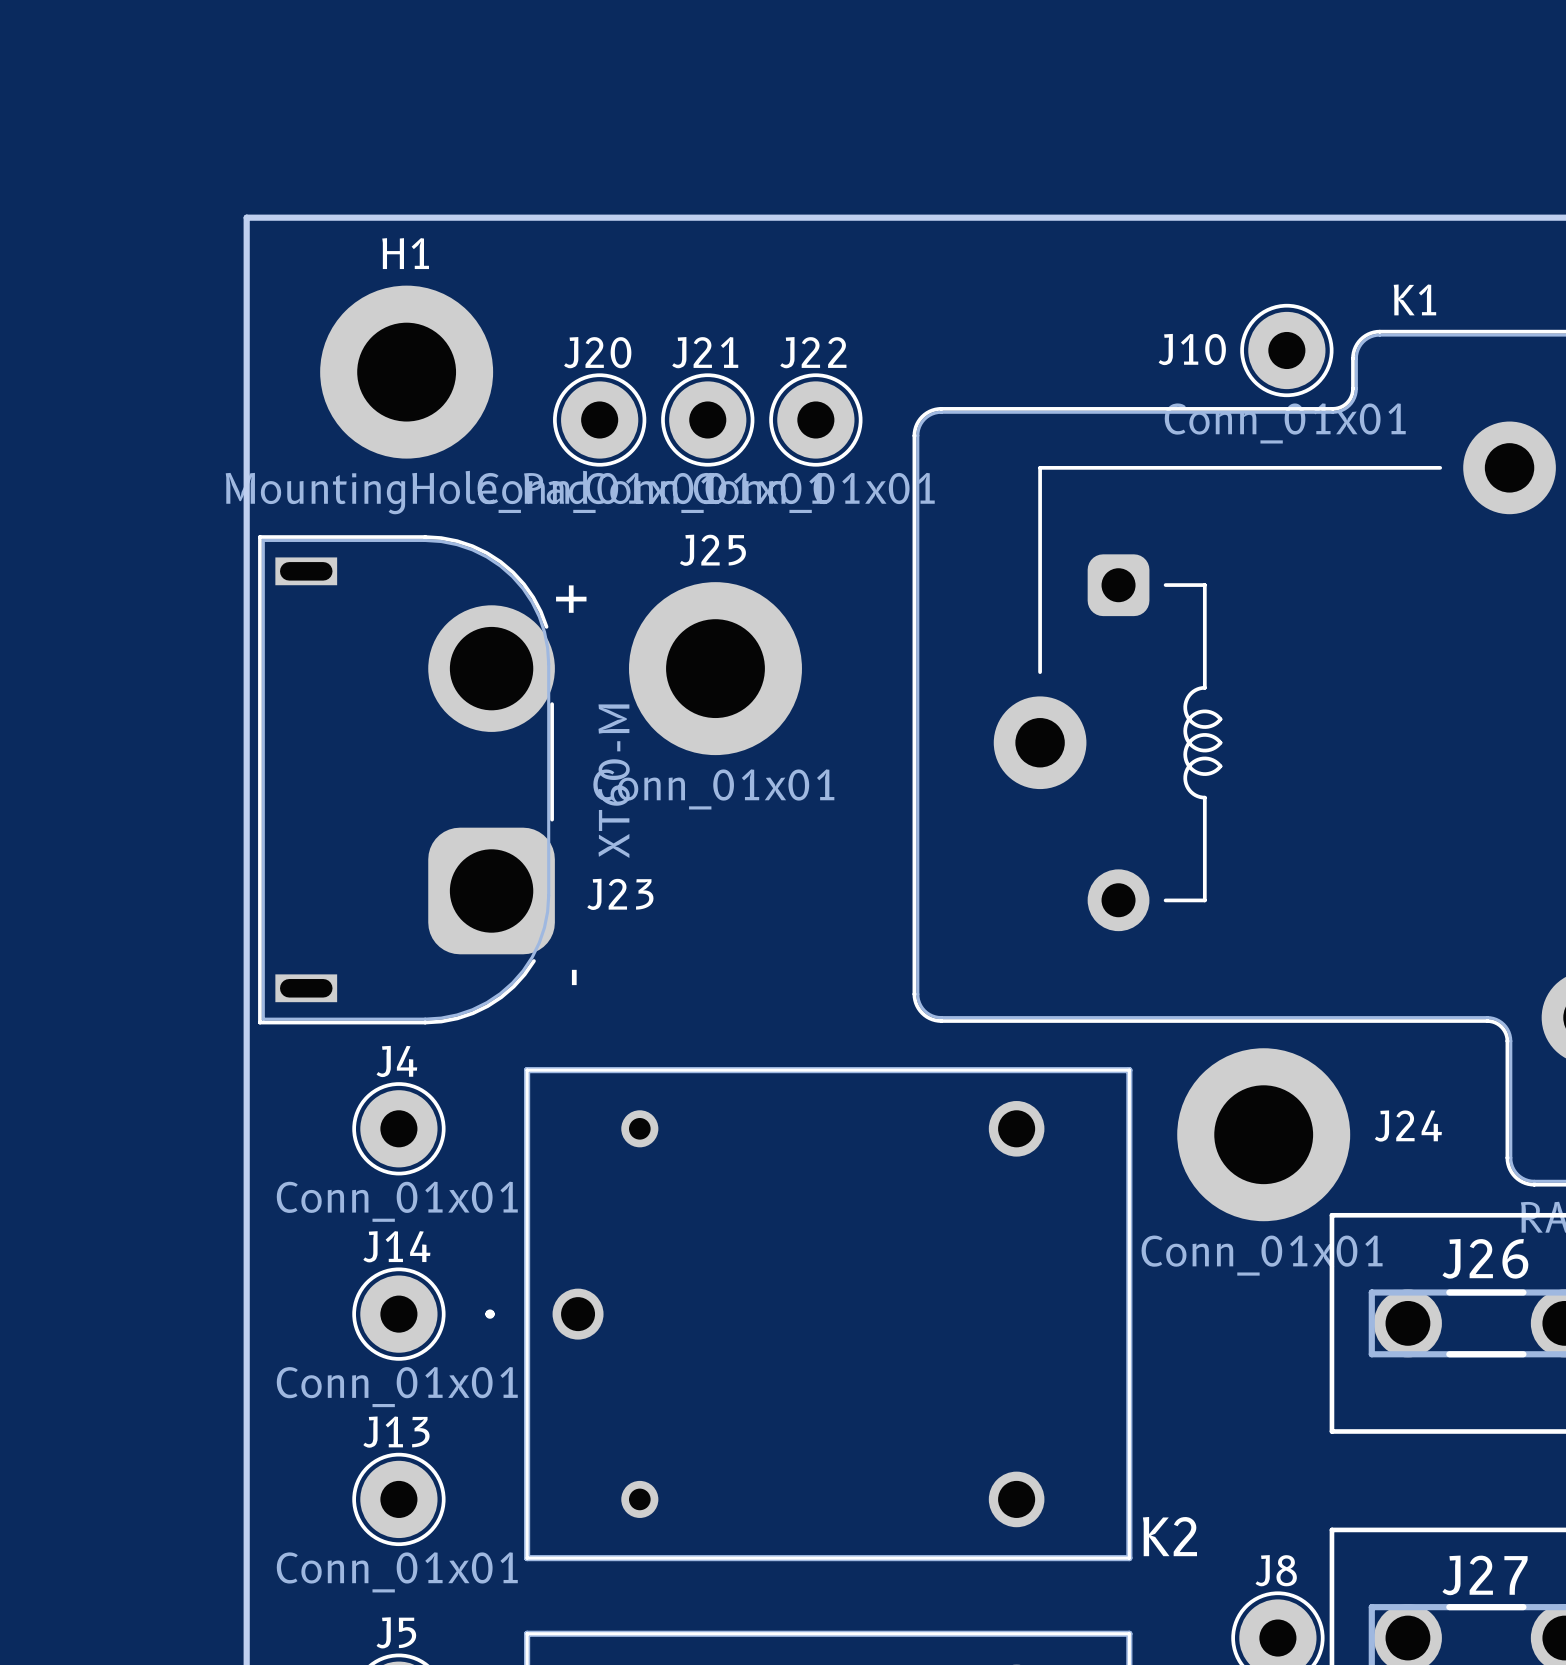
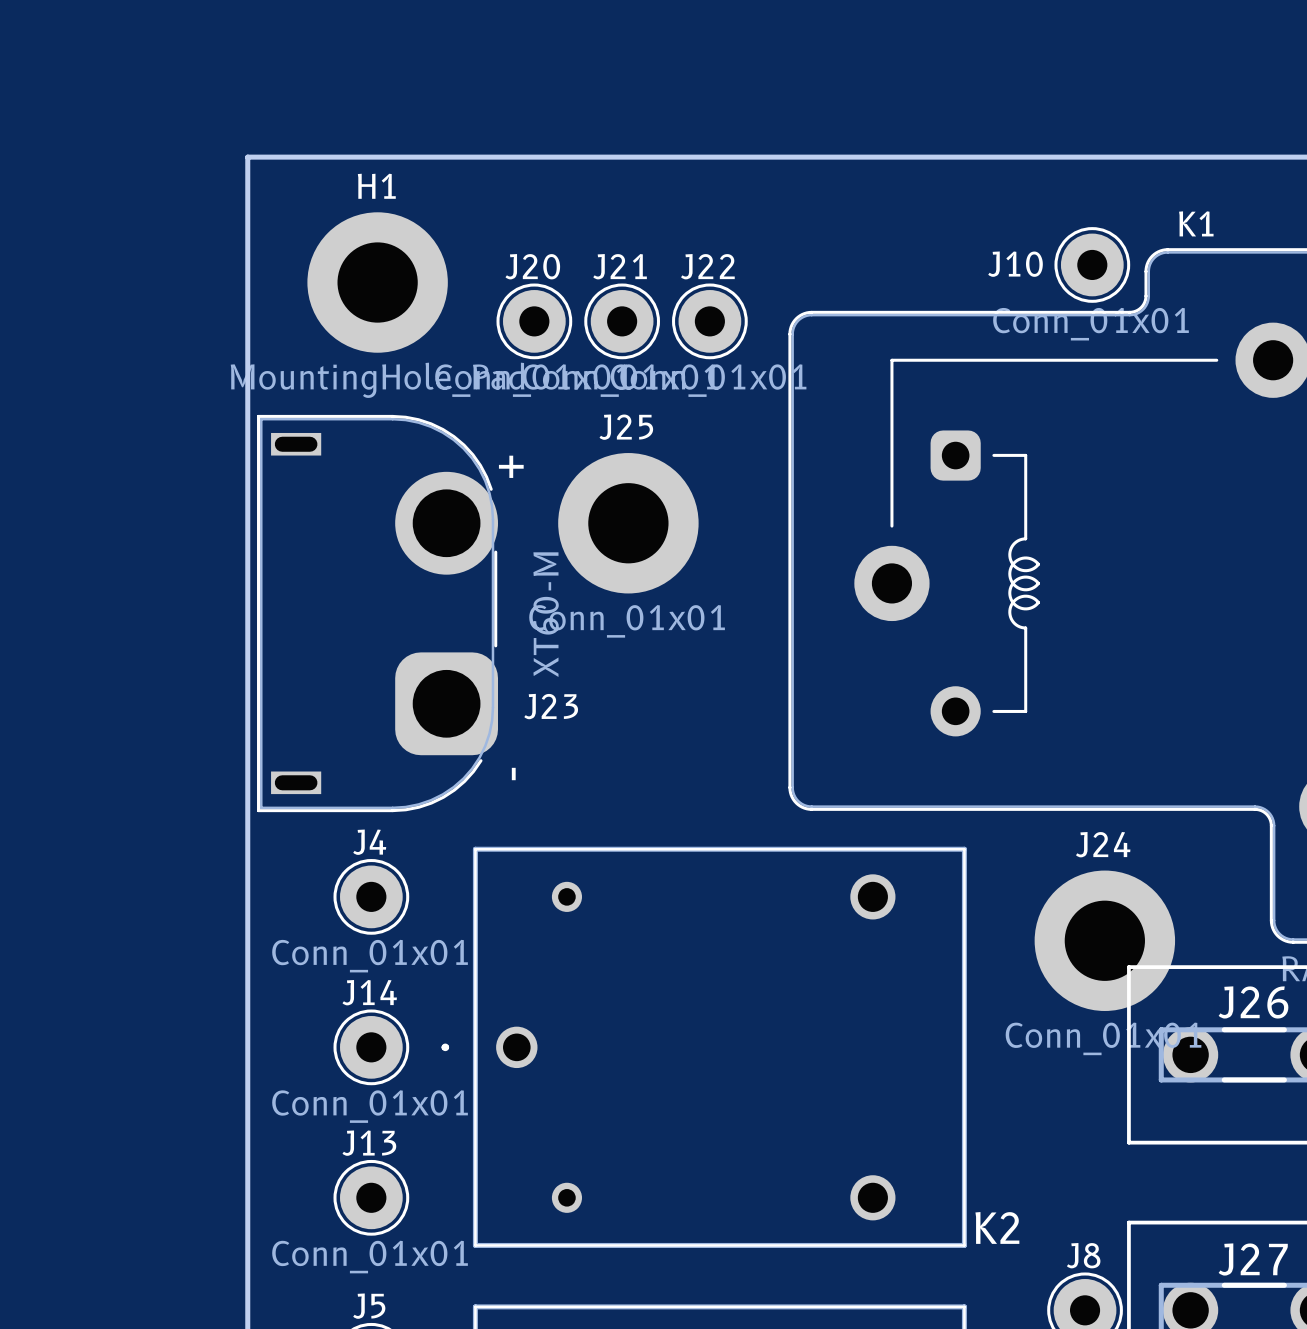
J24 name position: J24 (1408, 1126) -> J24 (1103, 844)
J24 position: (1263, 1134) -> (1104, 940)

